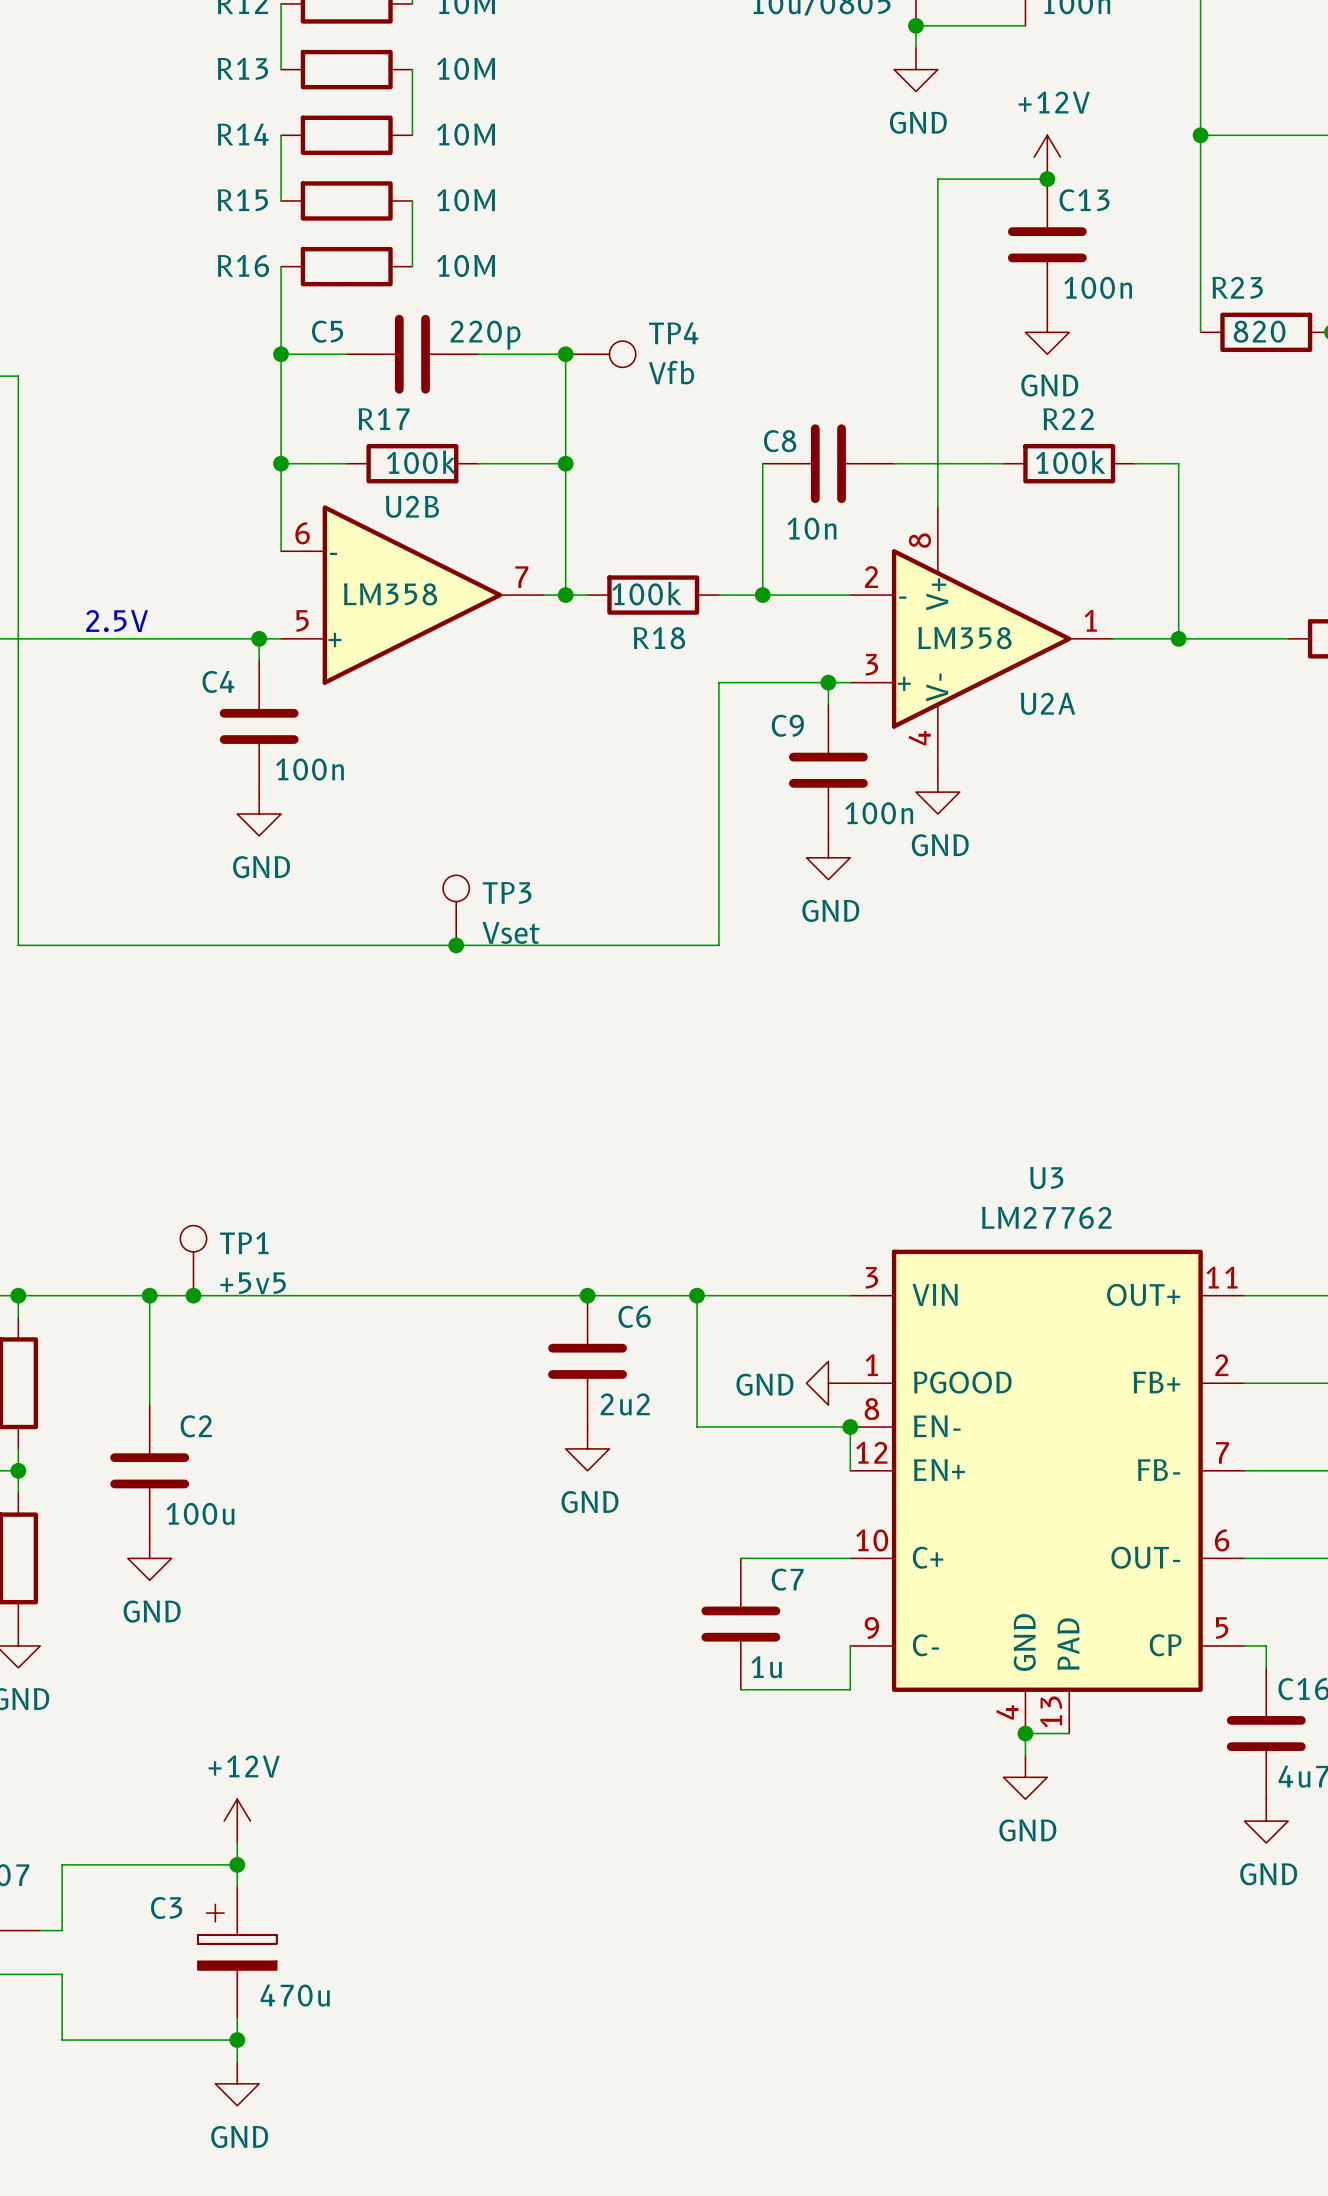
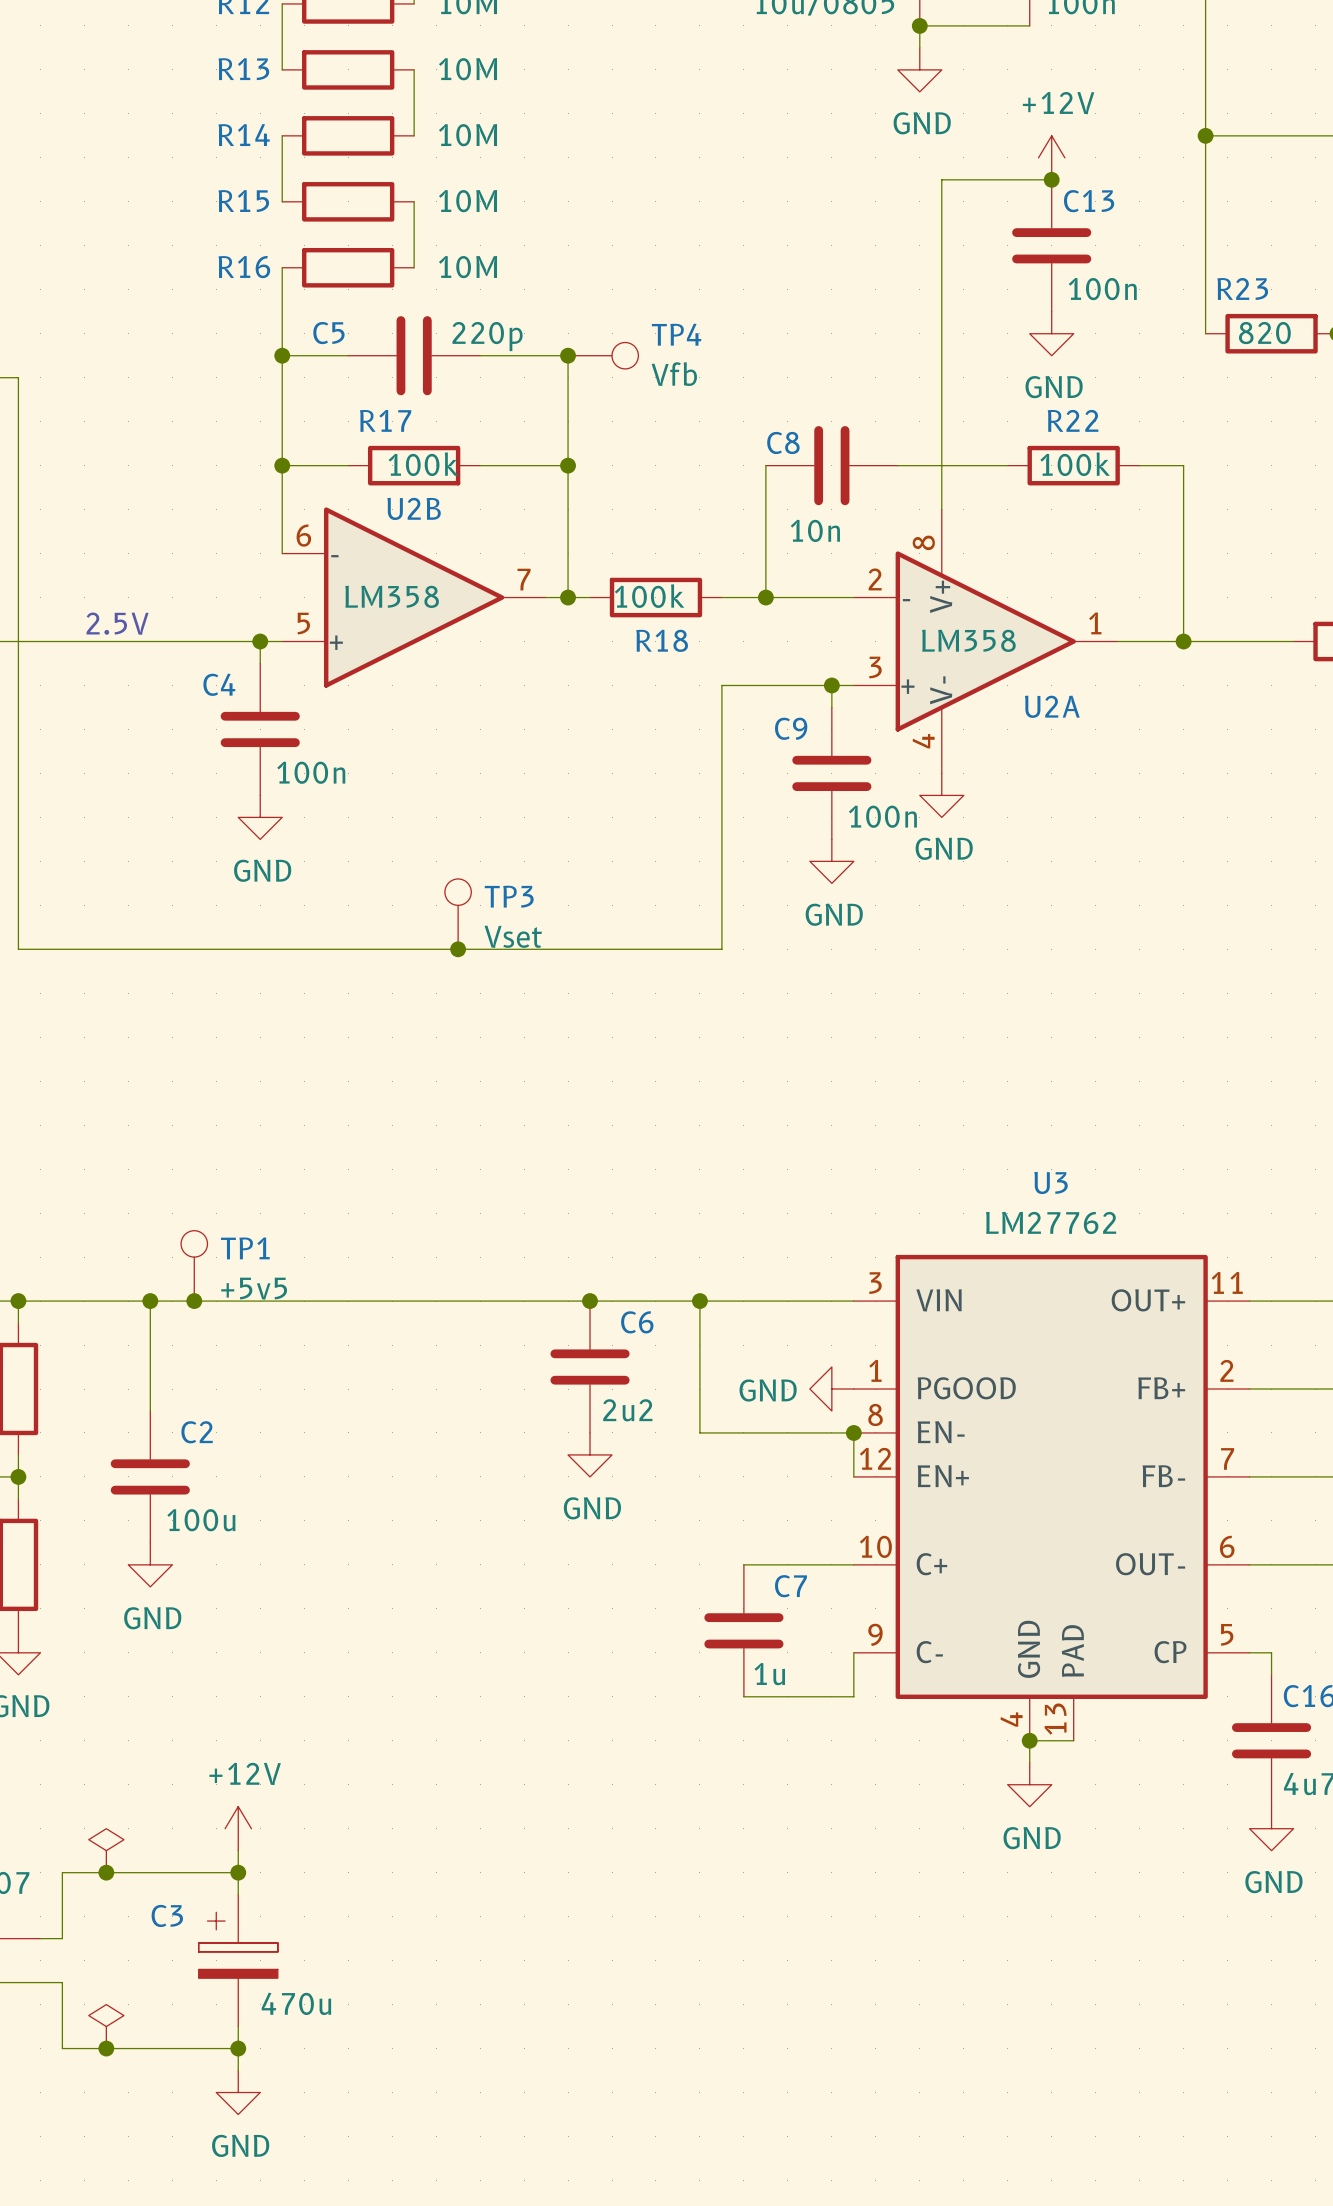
power symbol: none -> (106, 1850)
junction: none -> (106, 1872)
power symbol: none -> (106, 2026)
junction: none -> (106, 2048)

